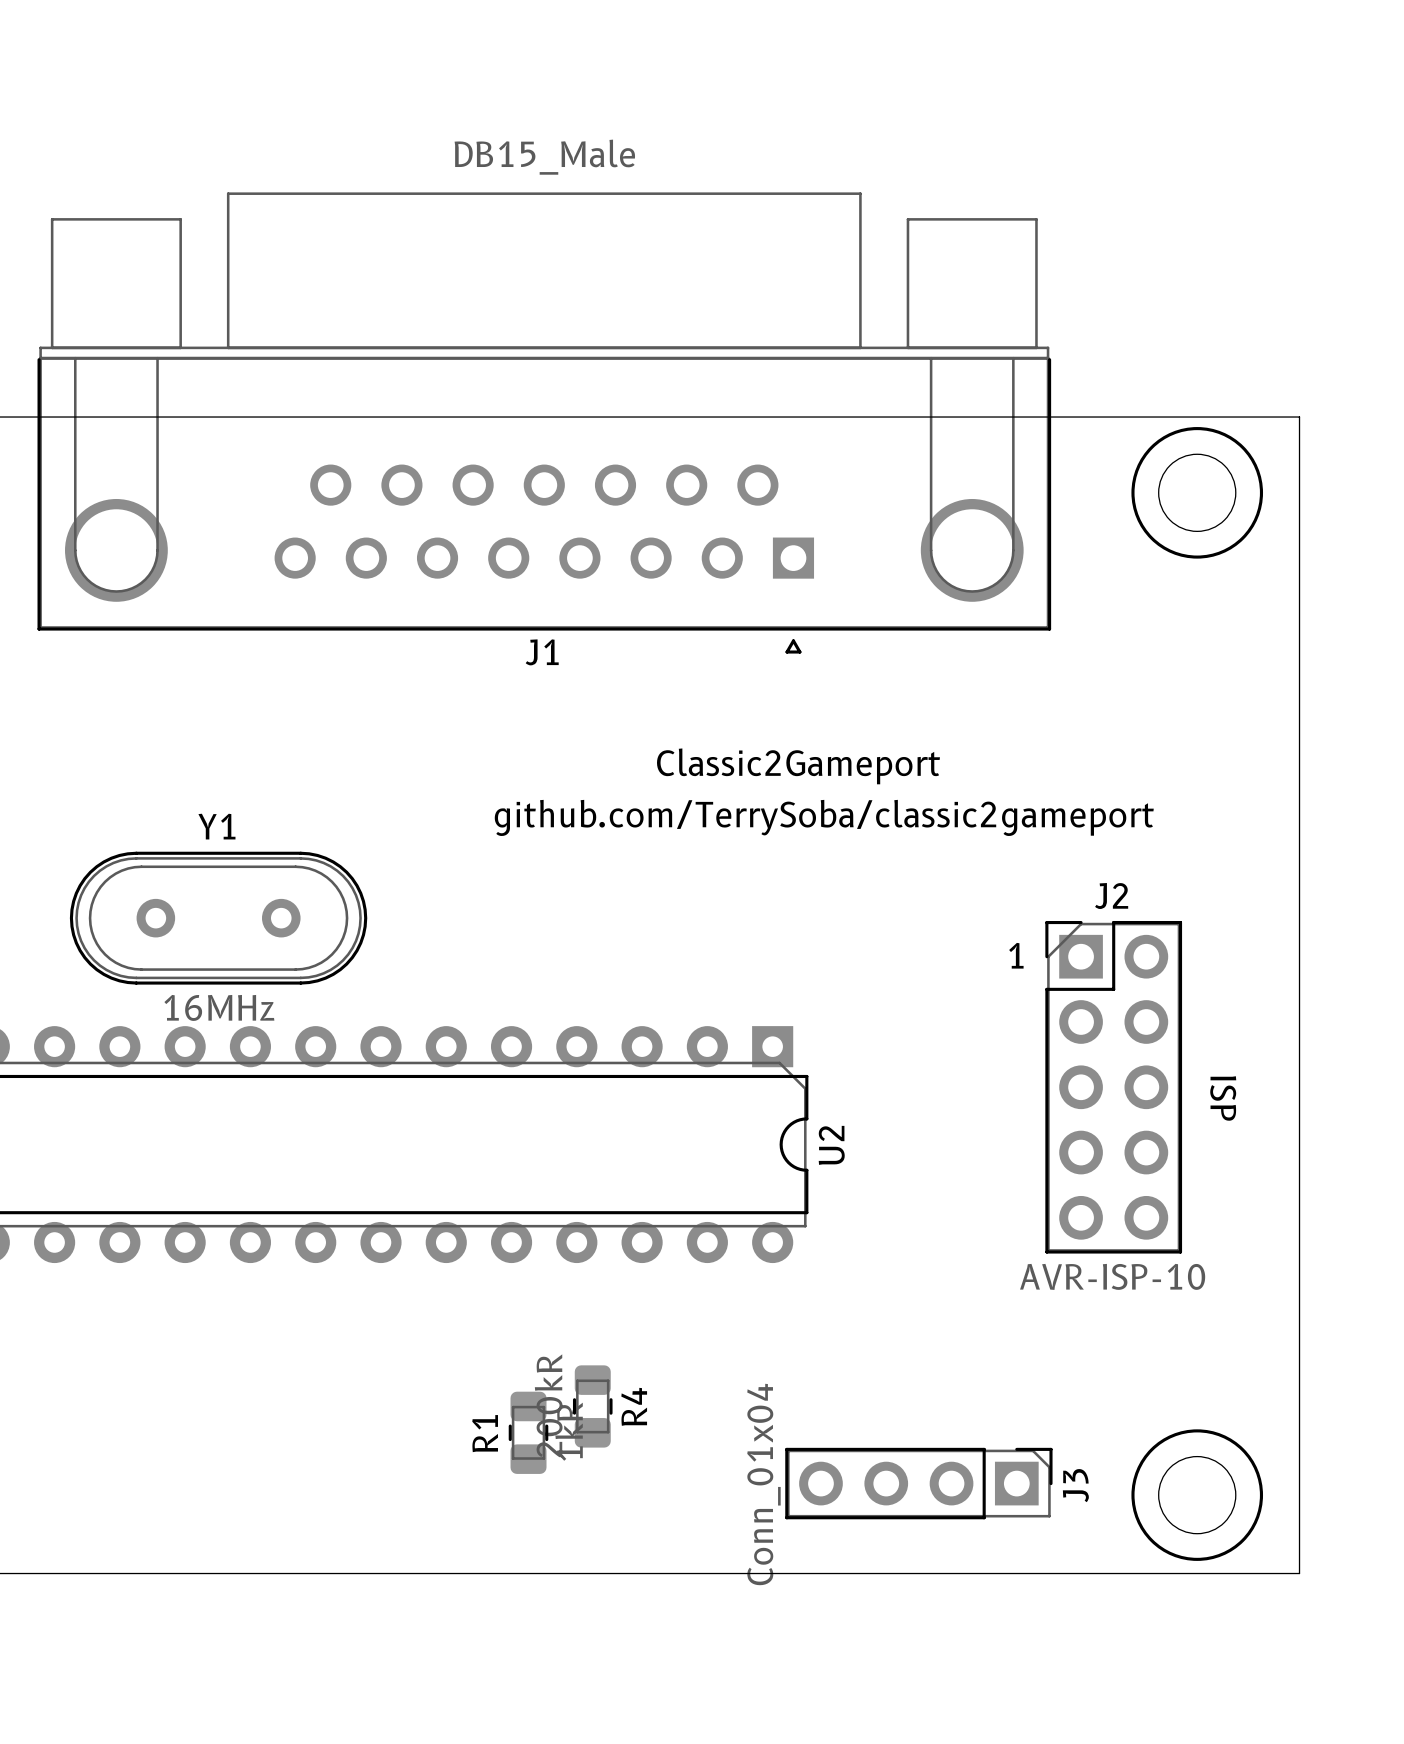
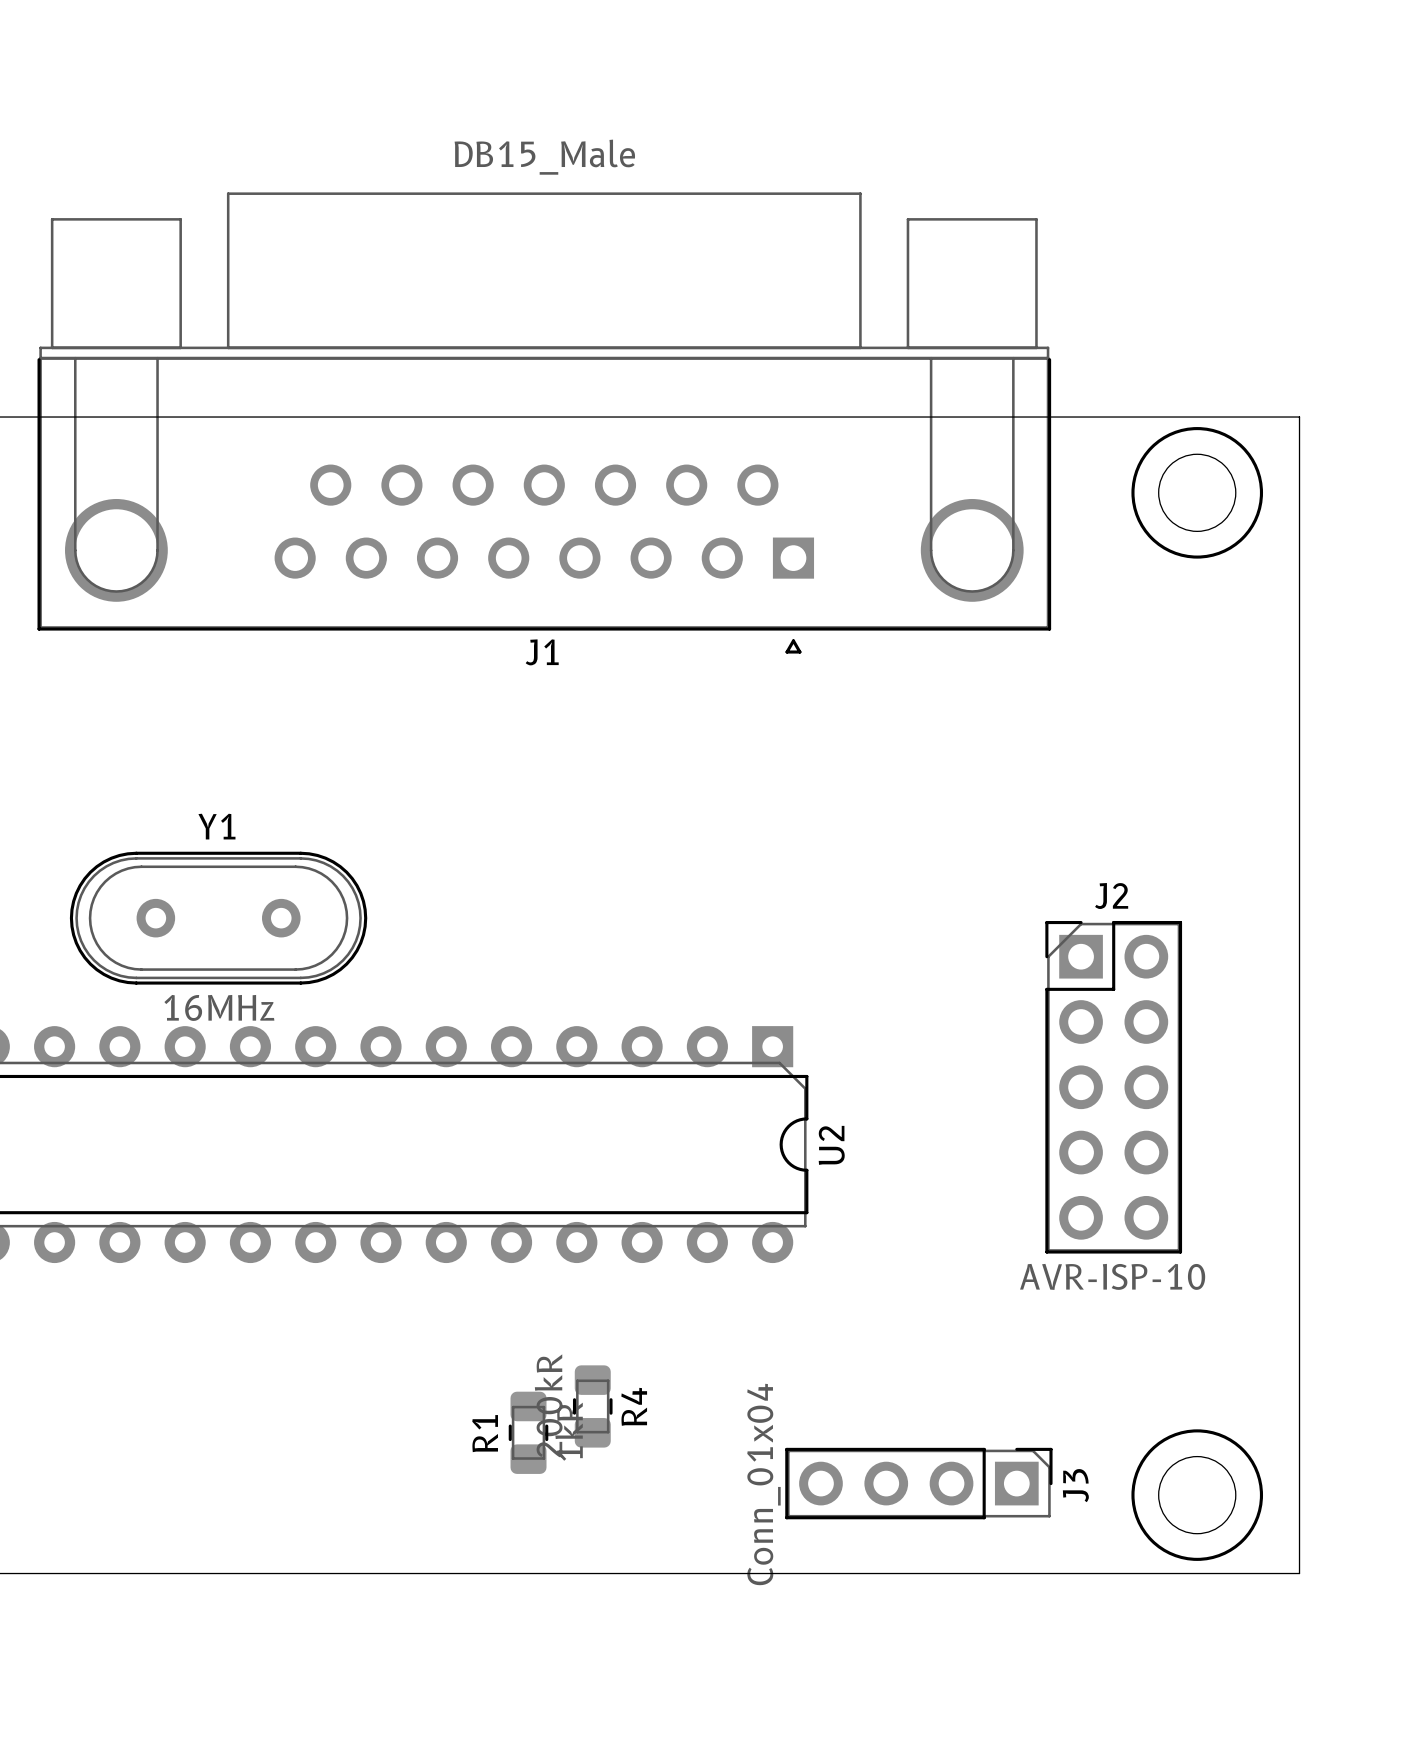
text: Classic2Gameport (798, 766) -> none
text: github.com/TerrySoba/classic2gameport (824, 817) -> none
text: 1 (1016, 955) -> none
text: ISP (1223, 1098) -> none

